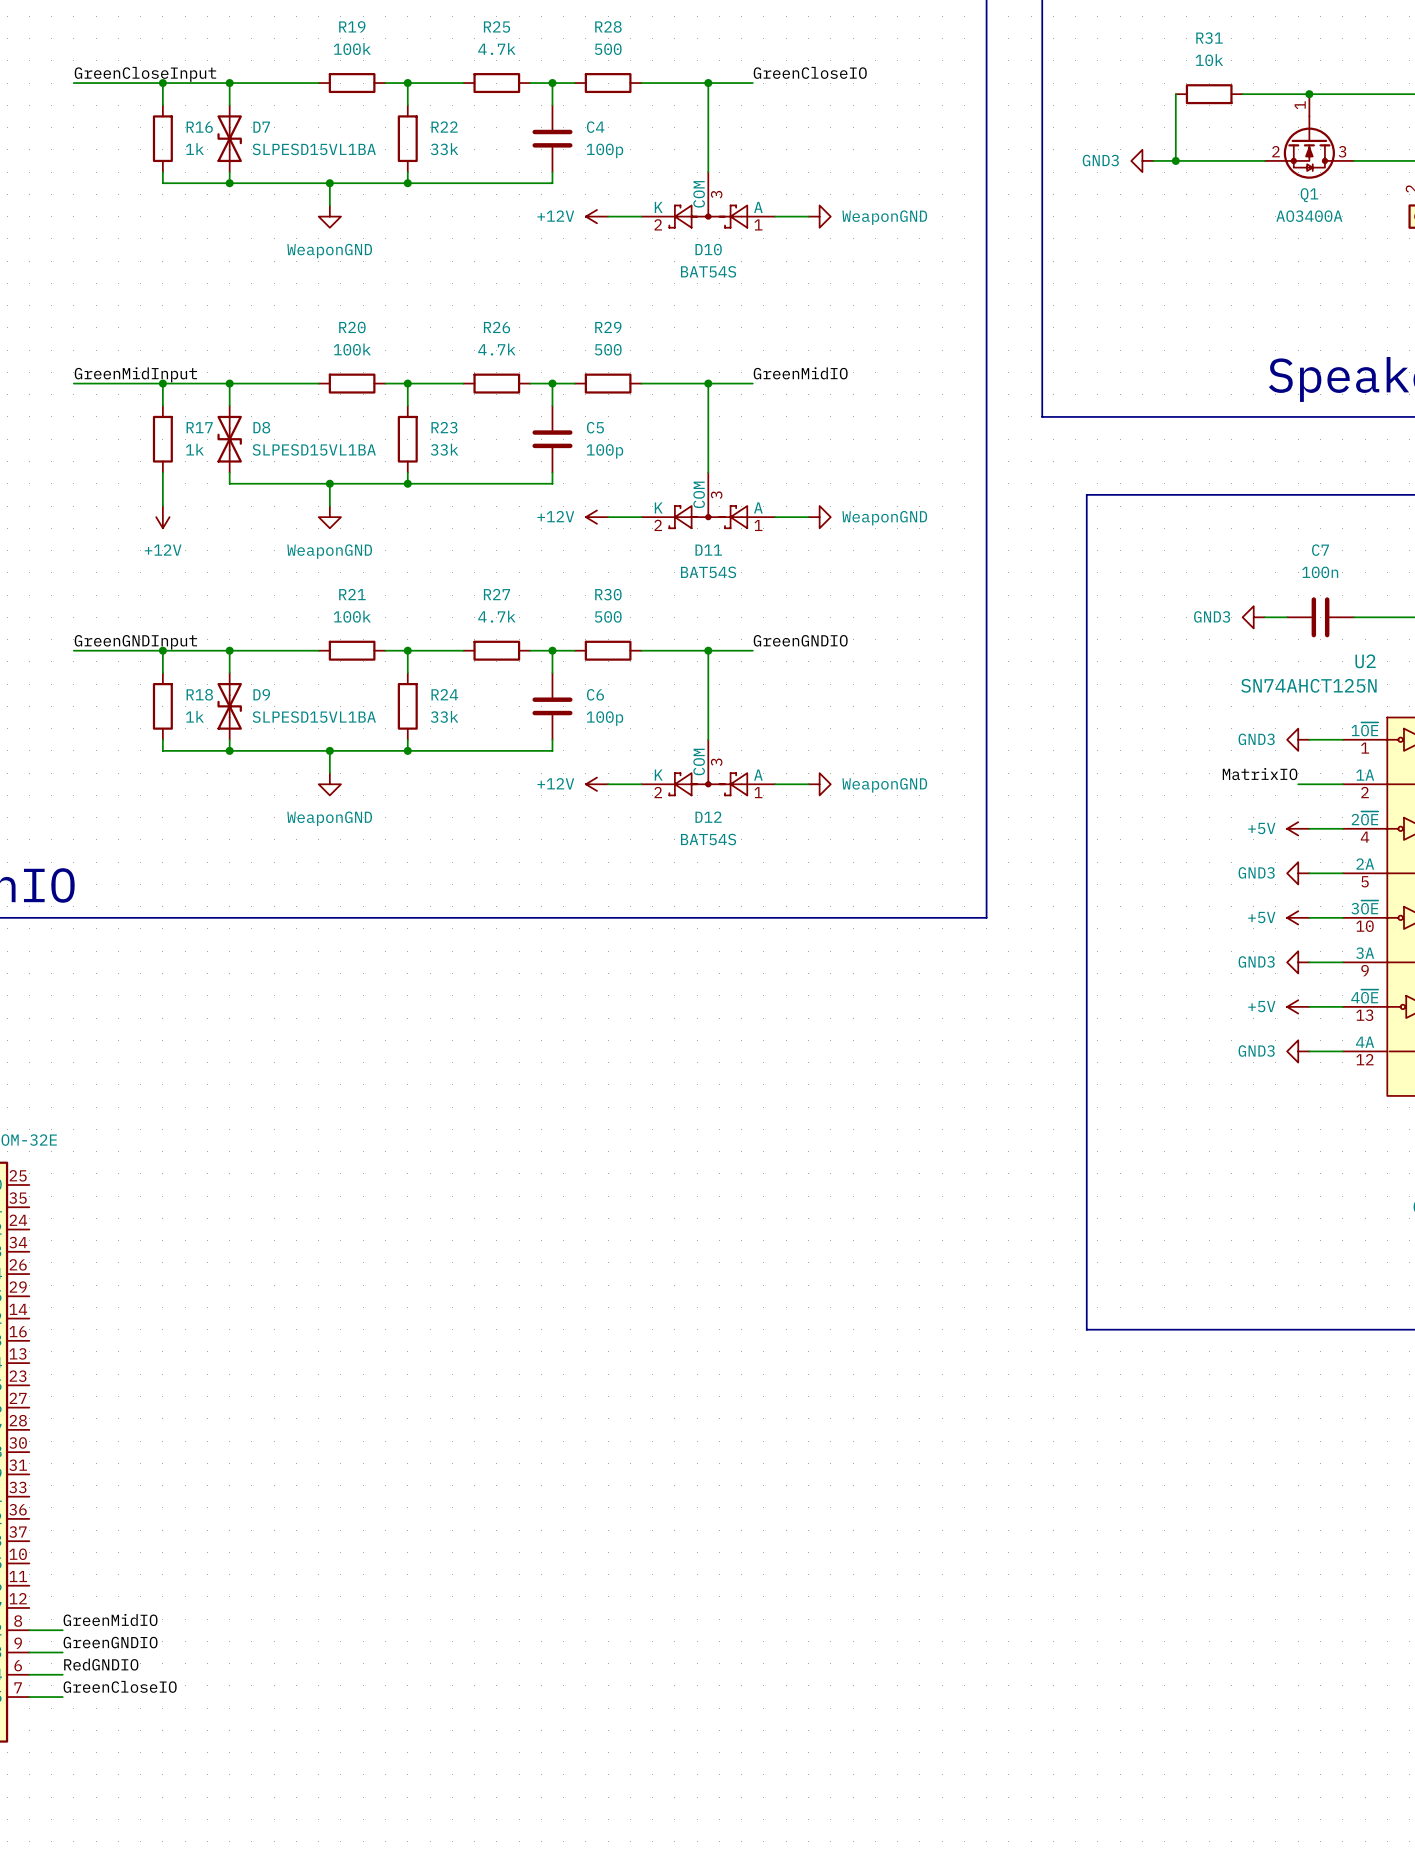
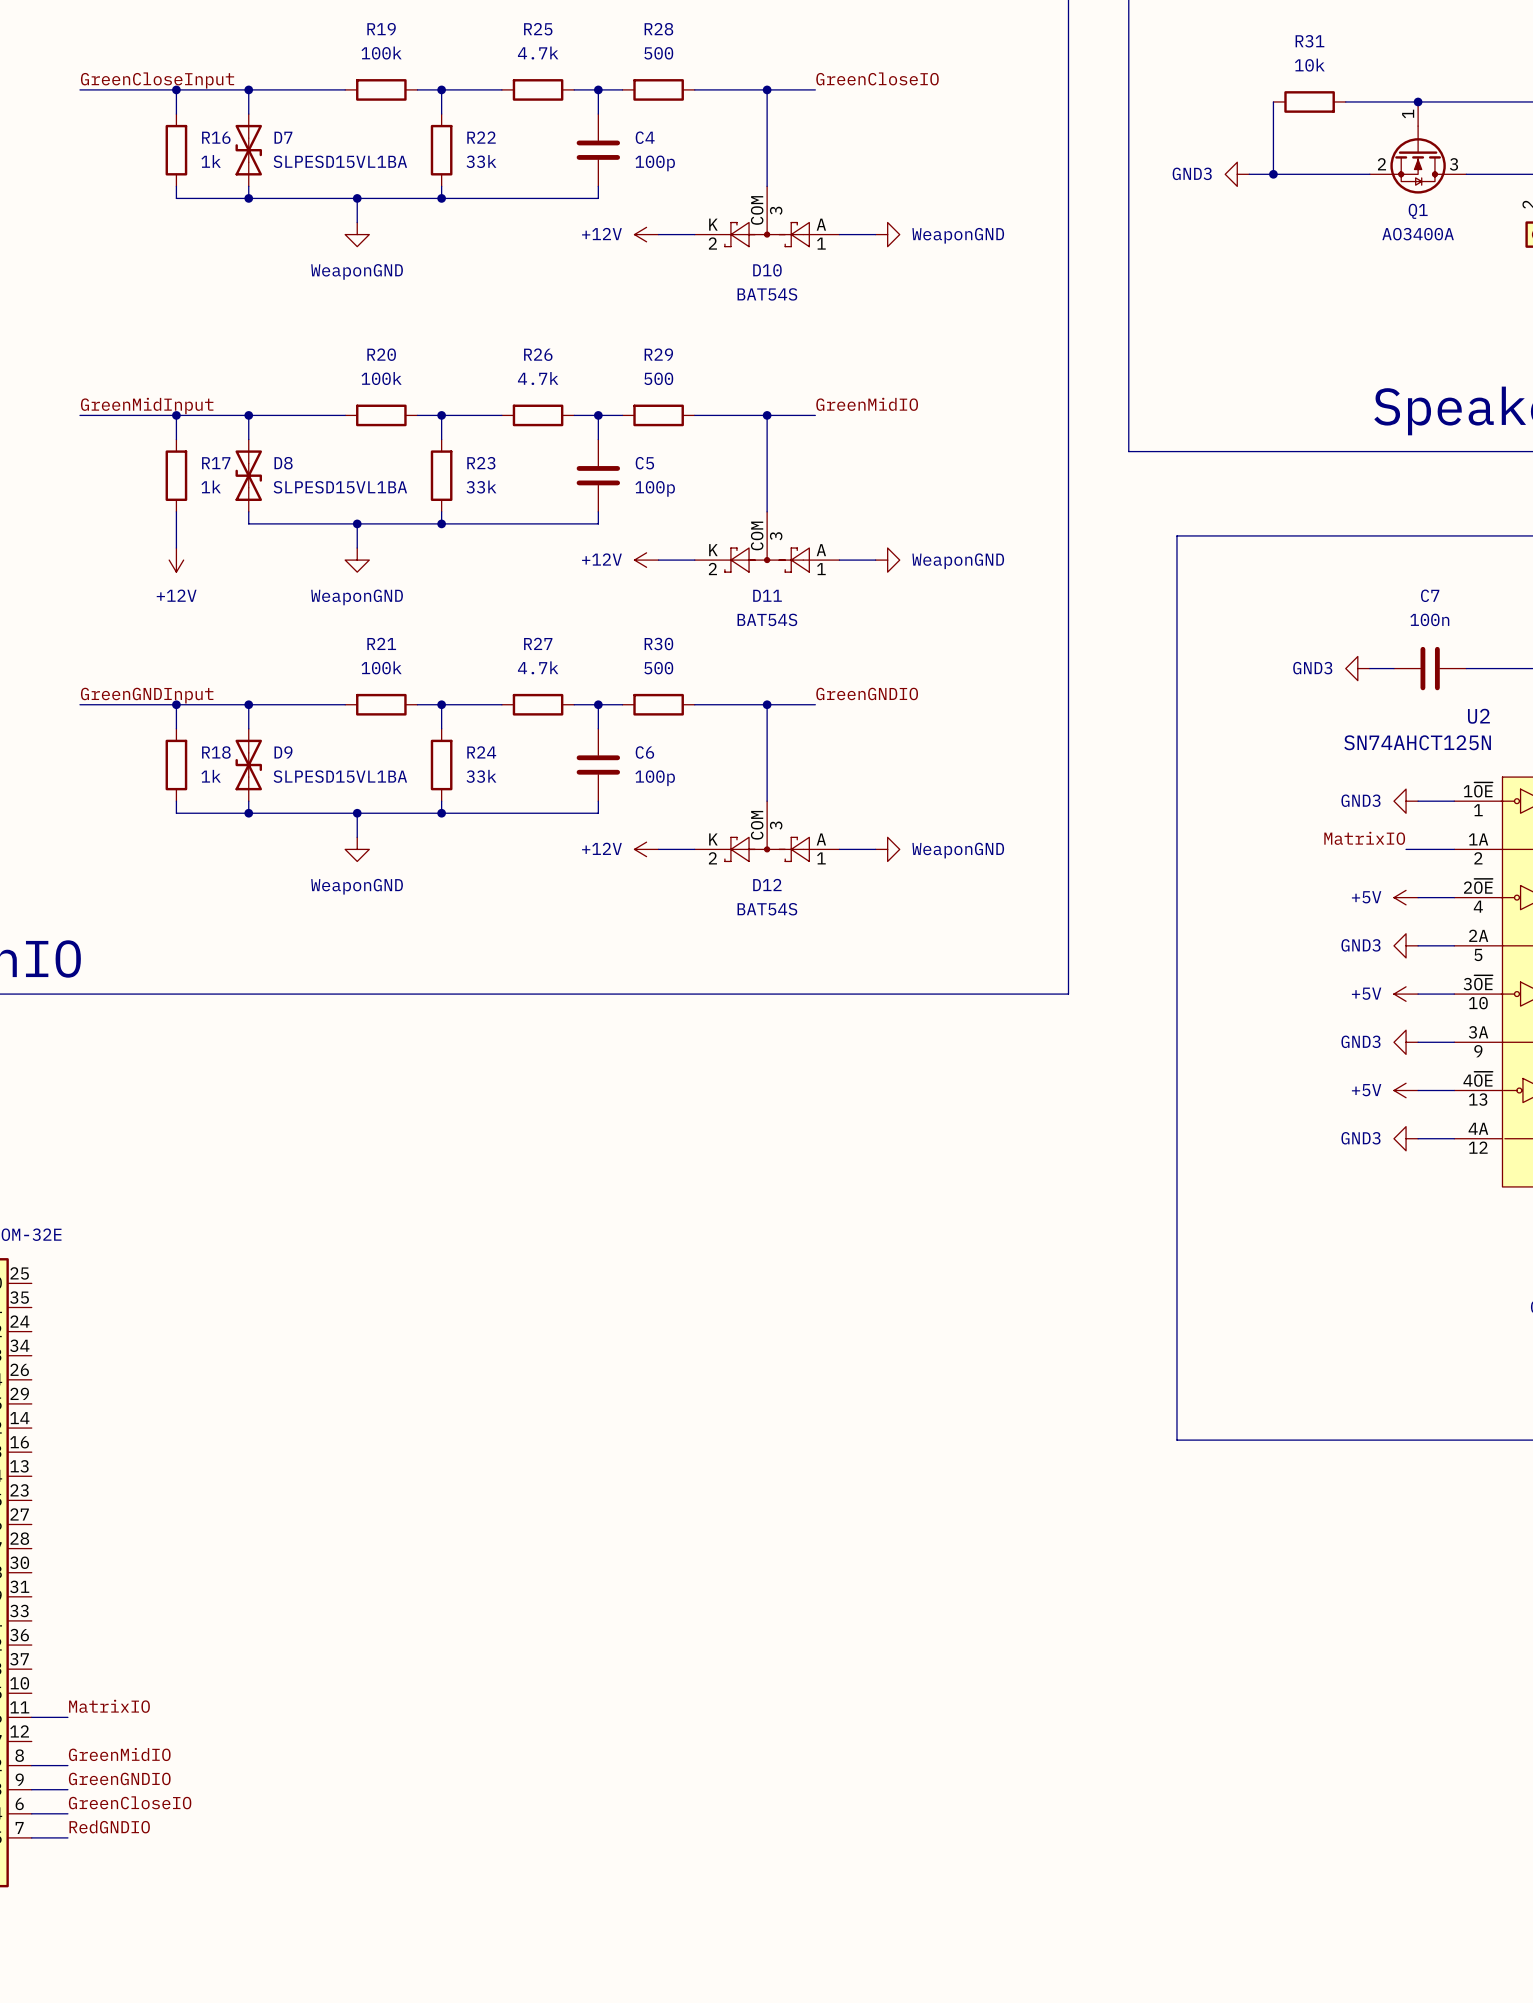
label: none -> MatrixIO (109, 1706)
wire: none -> (31, 1717) (67, 1717)
label: RedGNDIO (101, 1664) -> GreenCloseIO (130, 1802)
label: GreenCloseIO (120, 1686) -> RedGNDIO (109, 1826)

